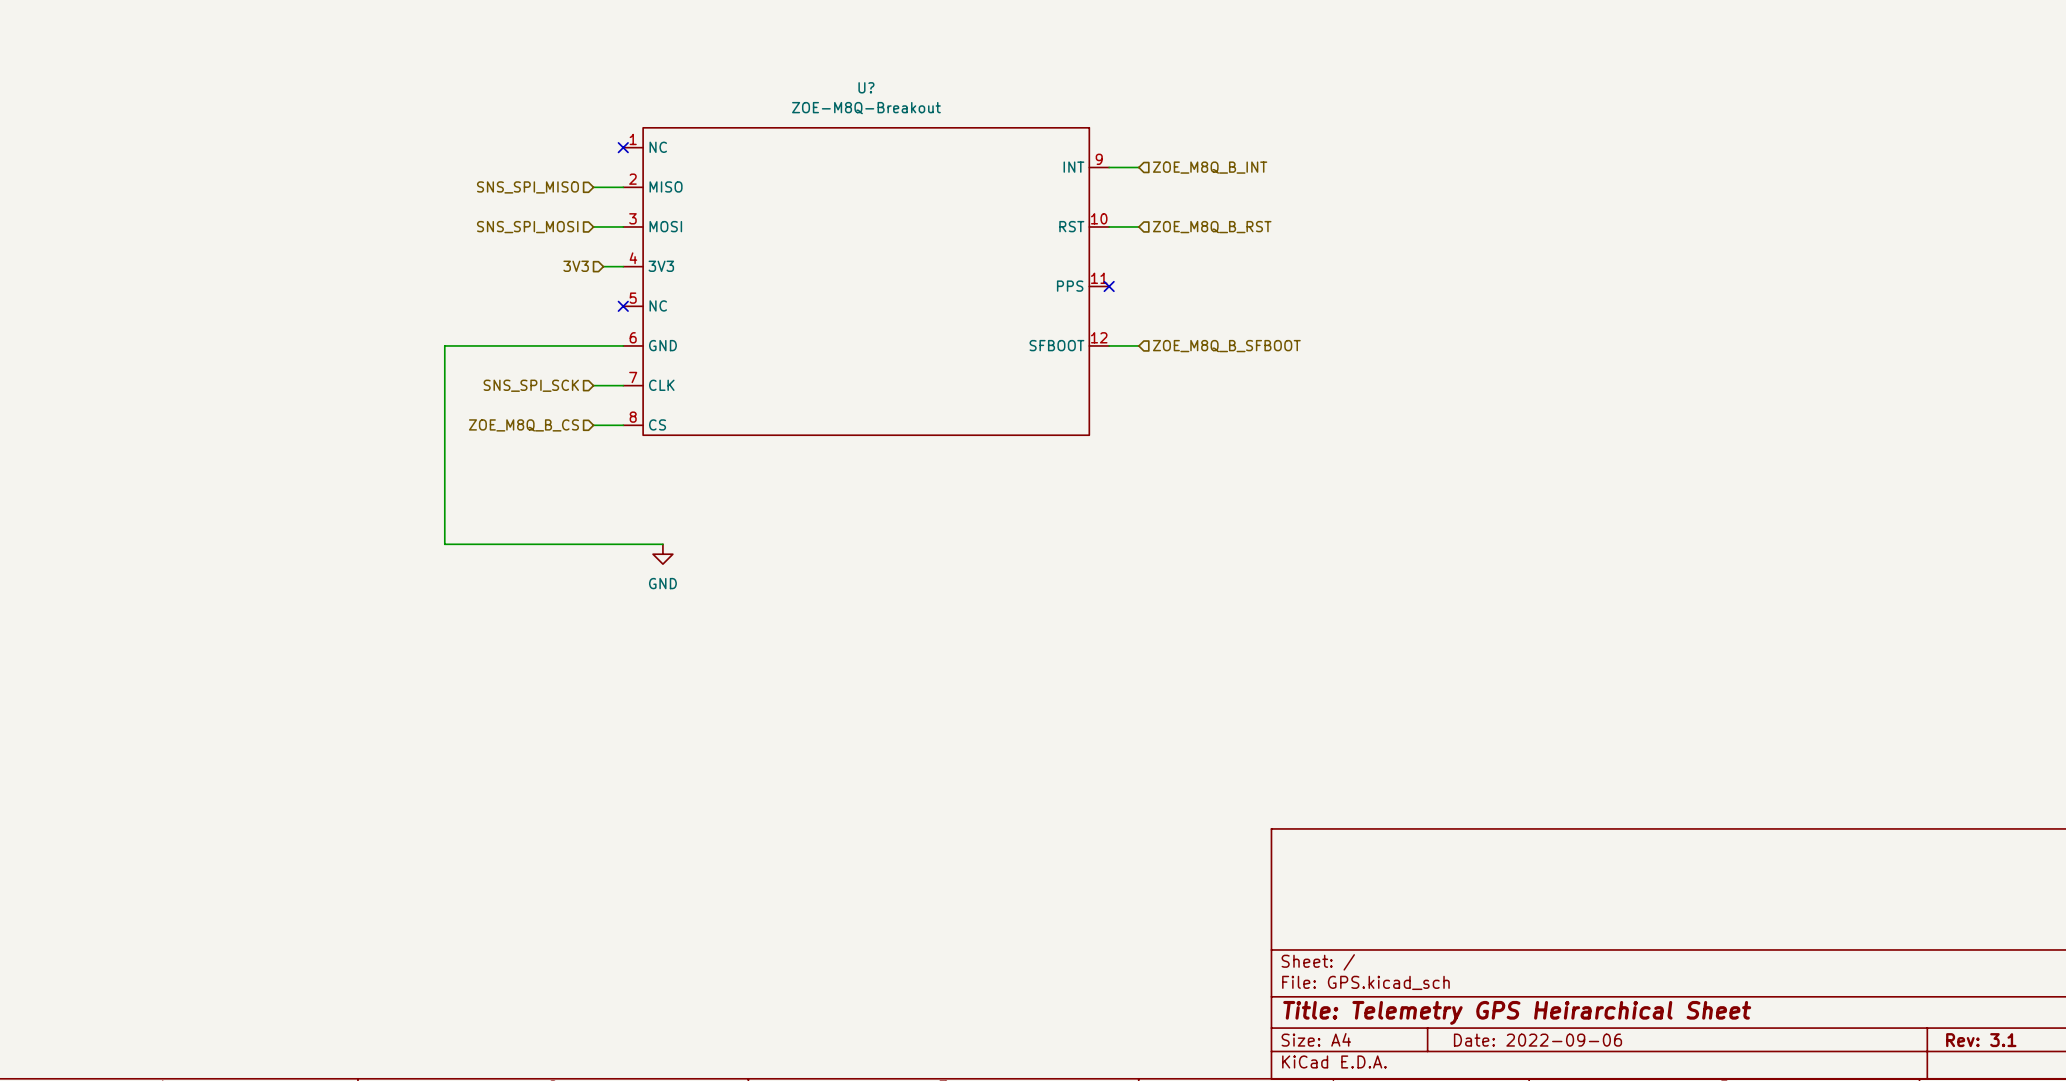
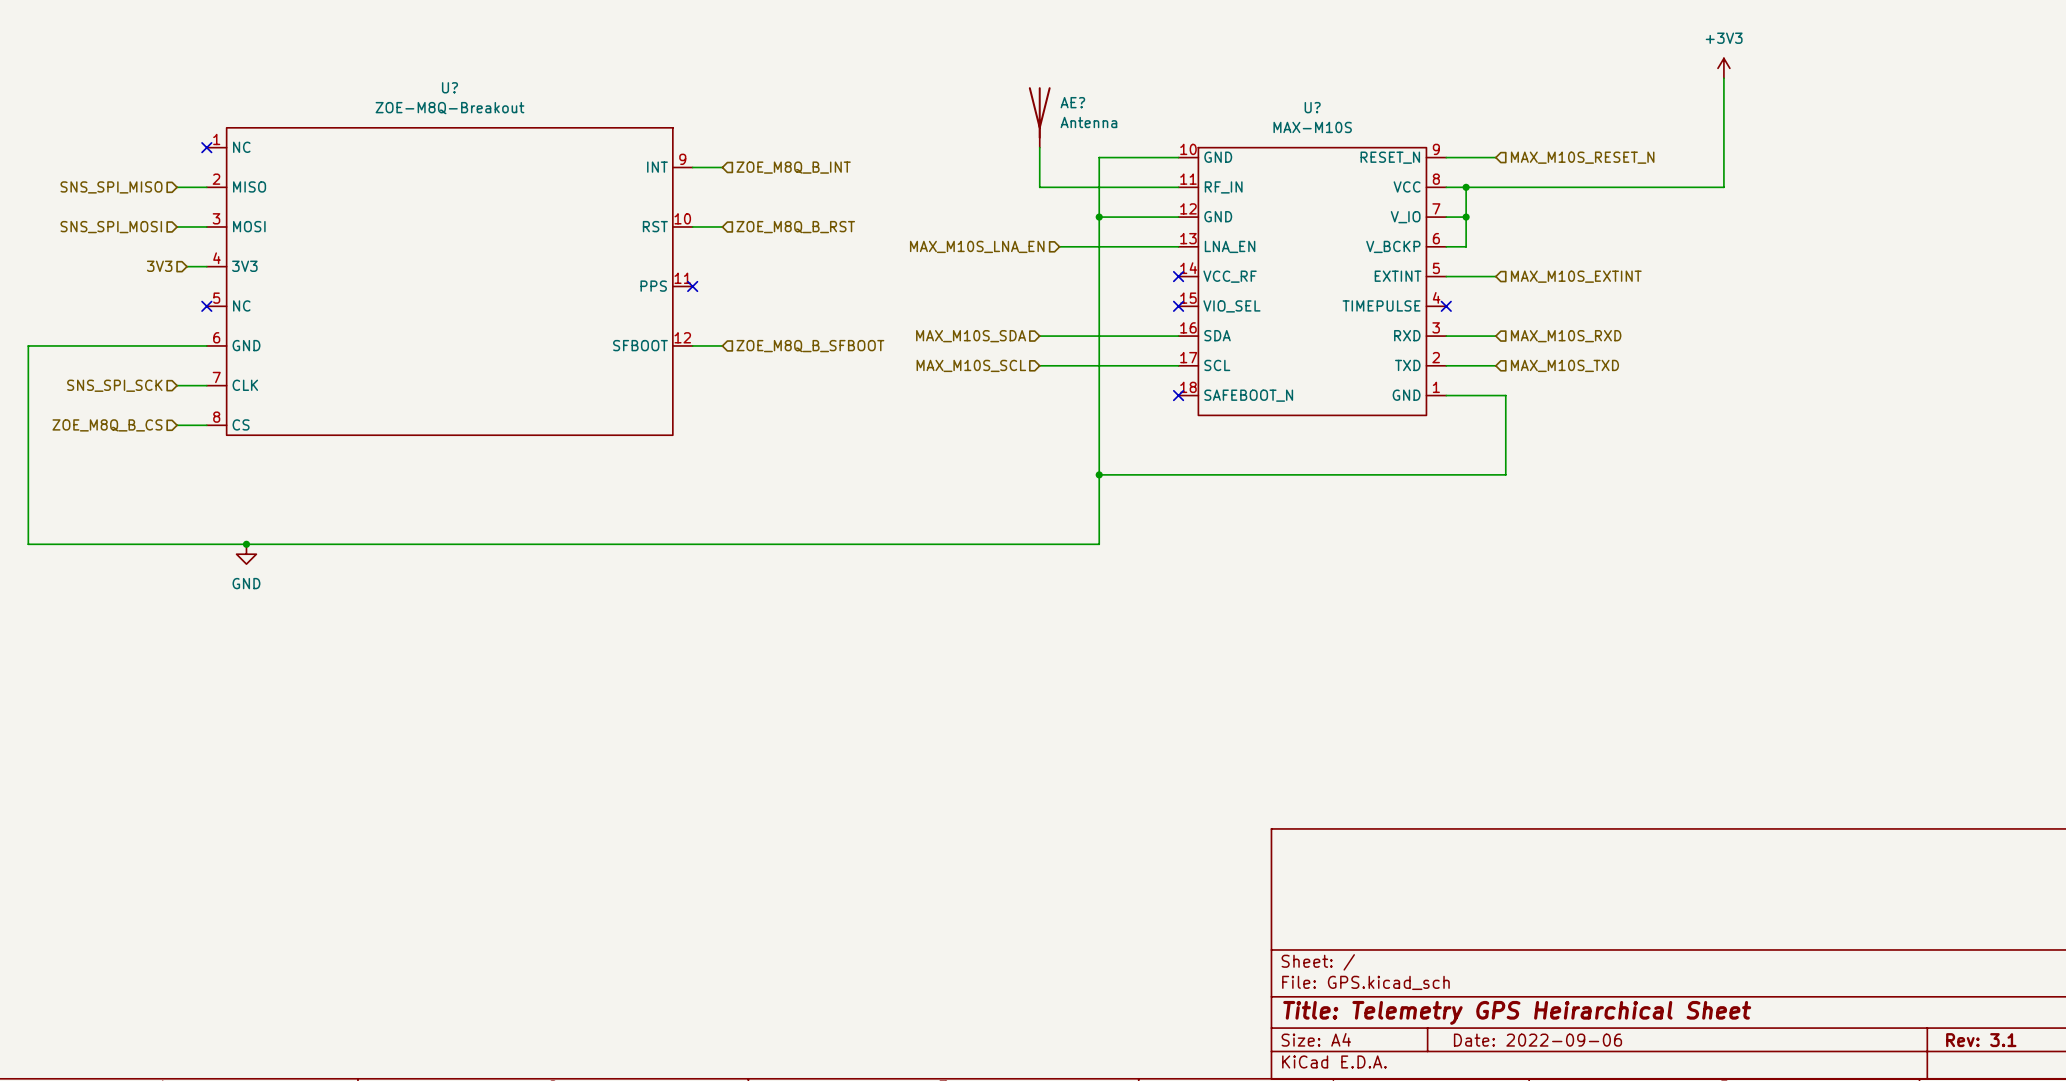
power symbol: none -> +3V3 (1723, 68)
wire: none -> (1723, 78) (1723, 187) (1446, 187)
AE?: none -> Antenna (1039, 117)
no-connect mark: none -> (206, 147)
no-connect mark: (623, 147) -> none
wire: none -> (1039, 147) (1039, 187) (1178, 187)
wire: none -> (1178, 157) (1099, 157) (1099, 544) (662, 544)
wire: none -> (1446, 157) (1495, 157)
hierarchical label: none -> MAX_M10S_RESET_N (1582, 157)
hierarchical label: none -> ZOE_M8Q_B_INT (793, 167)
wire: (1109, 167) (1138, 167) -> none
hierarchical label: ZOE_M8Q_B_INT (1210, 167) -> none
hierarchical label: none -> SNS_SPI_MISO (111, 187)
wire: none -> (177, 187) (206, 187)
hierarchical label: SNS_SPI_MISO (527, 187) -> none
wire: (593, 187) (623, 187) -> (692, 167) (722, 167)
wire: none -> (1466, 187) (1466, 246) (1446, 246)
junction: none -> (1466, 187)
wire: none -> (1099, 217) (1178, 217)
junction: none -> (1099, 217)
wire: none -> (1446, 217) (1466, 217)
junction: none -> (1466, 217)
wire: none -> (177, 226) (206, 226)
wire: (593, 226) (623, 226) -> (692, 226) (722, 226)
wire: (1109, 226) (1138, 226) -> none
hierarchical label: none -> SNS_SPI_MOSI (111, 227)
hierarchical label: SNS_SPI_MOSI (527, 227) -> none
hierarchical label: none -> ZOE_M8Q_B_RST (795, 227)
hierarchical label: ZOE_M8Q_B_RST (1212, 227) -> none
hierarchical label: none -> MAX_M10S_LNA_EN (977, 246)
wire: none -> (1059, 246) (1178, 246)
hierarchical label: none -> 3V3 (159, 266)
wire: none -> (186, 266) (206, 266)
hierarchical label: 3V3 (576, 266) -> none
wire: (603, 266) (623, 266) -> none
no-connect mark: none -> (1178, 276)
wire: none -> (1446, 276) (1495, 276)
hierarchical label: none -> MAX_M10S_EXTINT (1576, 276)
U?: none -> ZOE-M8Q-Breakout (449, 281)
U?: ZOE-M8Q-Breakout (866, 281) -> none
U?: none -> MAX-M10S (1312, 281)
no-connect mark: none -> (692, 286)
no-connect mark: (1109, 286) -> none
no-connect mark: none -> (206, 306)
no-connect mark: (623, 306) -> none
no-connect mark: none -> (1178, 306)
no-connect mark: none -> (1446, 306)
hierarchical label: none -> MAX_M10S_SDA (971, 336)
wire: none -> (1039, 336) (1178, 336)
wire: none -> (1446, 336) (1495, 336)
hierarchical label: none -> MAX_M10S_RXD (1566, 336)
wire: (623, 345) (444, 345) (444, 544) -> (206, 345) (28, 345) (28, 544) (444, 544)
wire: (1109, 345) (1138, 345) -> none
hierarchical label: none -> ZOE_M8Q_B_SFBOOT (810, 346)
hierarchical label: ZOE_M8Q_B_SFBOOT (1226, 346) -> none
hierarchical label: none -> MAX_M10S_SCL (971, 365)
wire: none -> (1039, 365) (1178, 365)
wire: none -> (1446, 365) (1495, 365)
hierarchical label: none -> MAX_M10S_TXD (1564, 365)
hierarchical label: none -> SNS_SPI_SCK (114, 385)
wire: none -> (177, 385) (206, 385)
hierarchical label: SNS_SPI_SCK (531, 385) -> none
wire: (593, 385) (623, 385) -> (692, 345) (722, 345)
no-connect mark: none -> (1178, 395)
wire: none -> (1446, 395) (1505, 395) (1505, 474) (1099, 474)
hierarchical label: none -> ZOE_M8Q_B_CS (107, 425)
wire: none -> (177, 425) (206, 425)
hierarchical label: ZOE_M8Q_B_CS (523, 425) -> none
wire: (593, 425) (623, 425) -> none
junction: none -> (1099, 474)
junction: none -> (246, 544)
power symbol: none -> GND (246, 554)
power symbol: GND (662, 554) -> none

